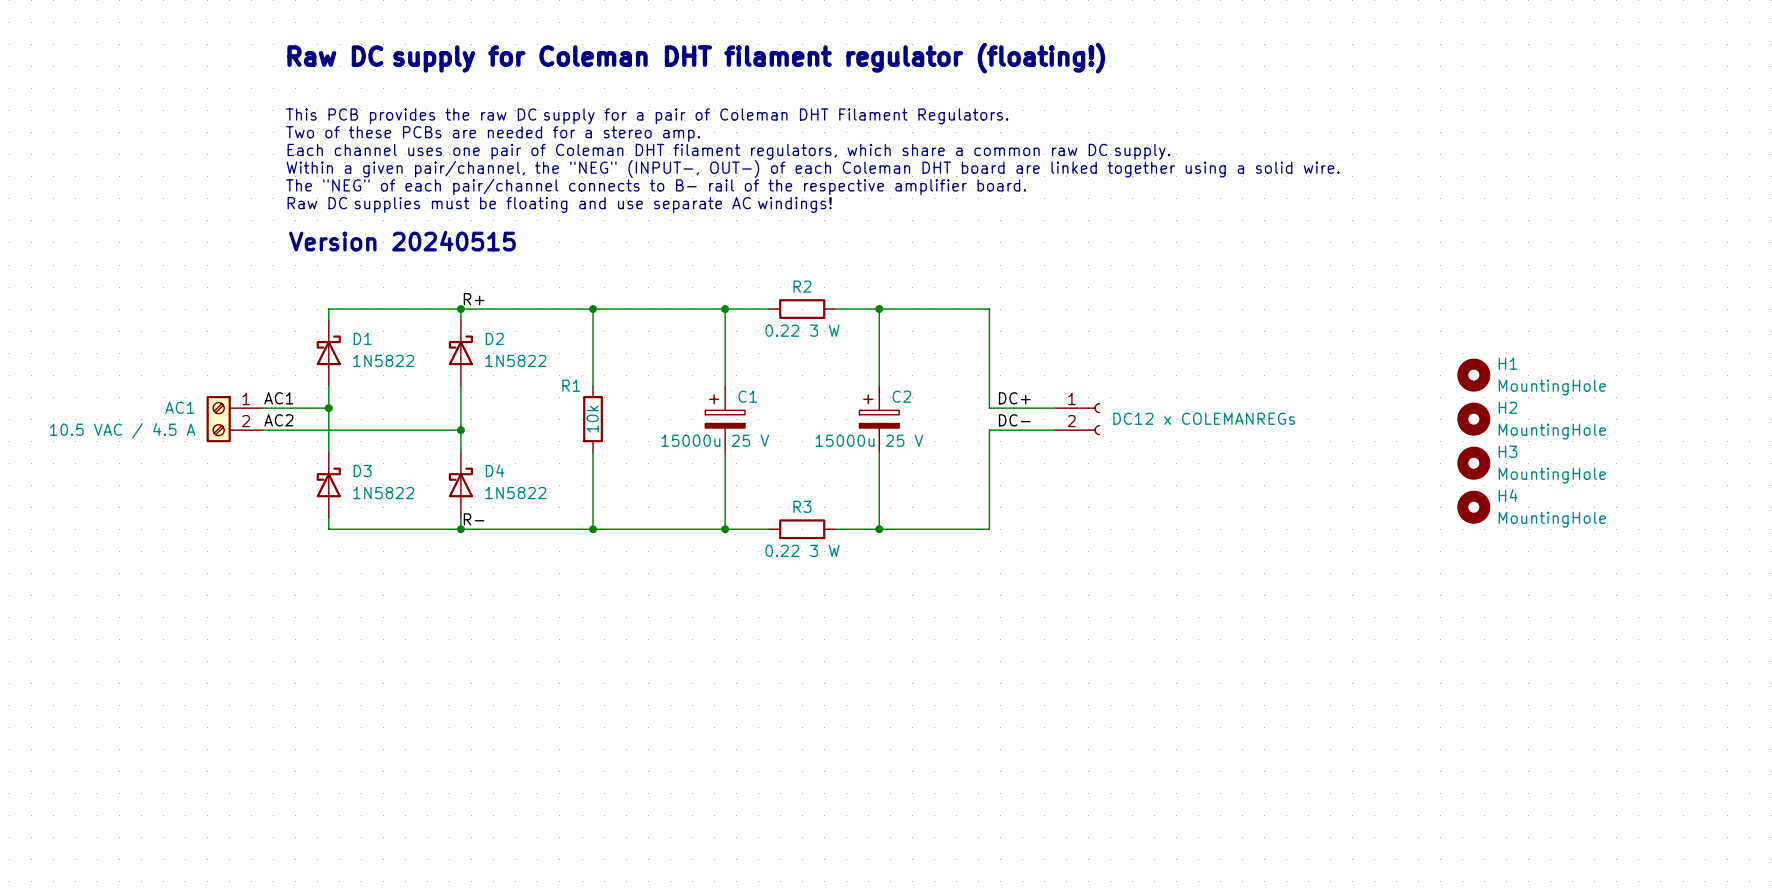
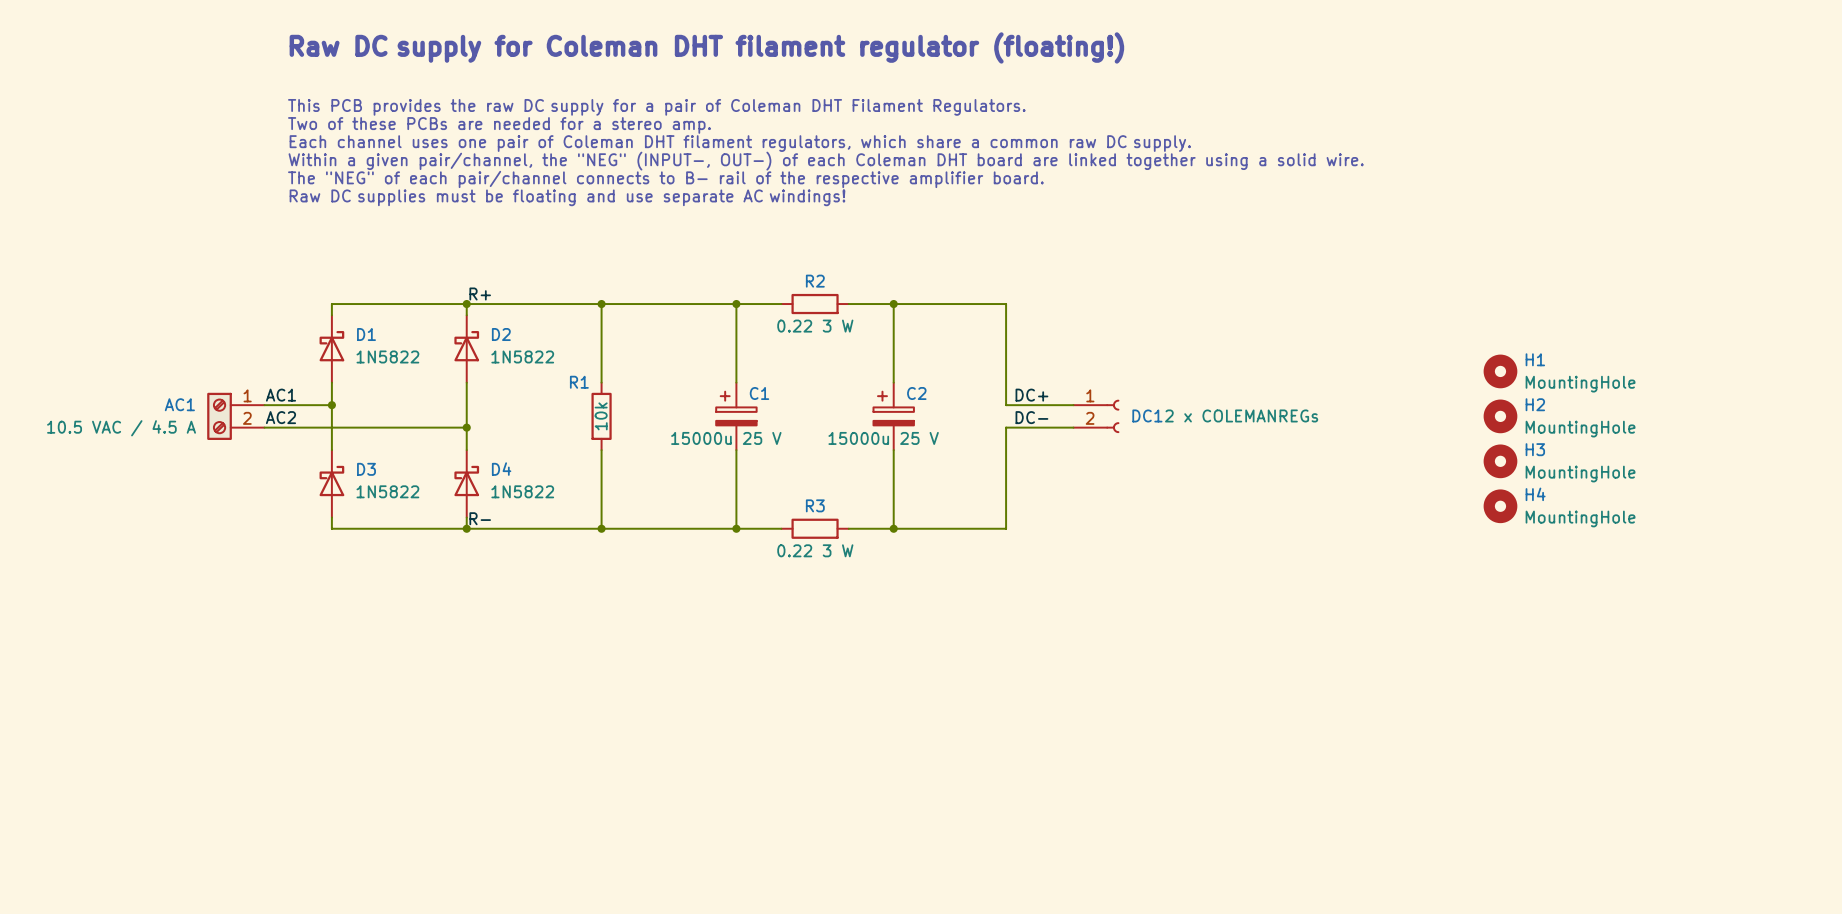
text: Version 20240515 (402, 241) -> none

